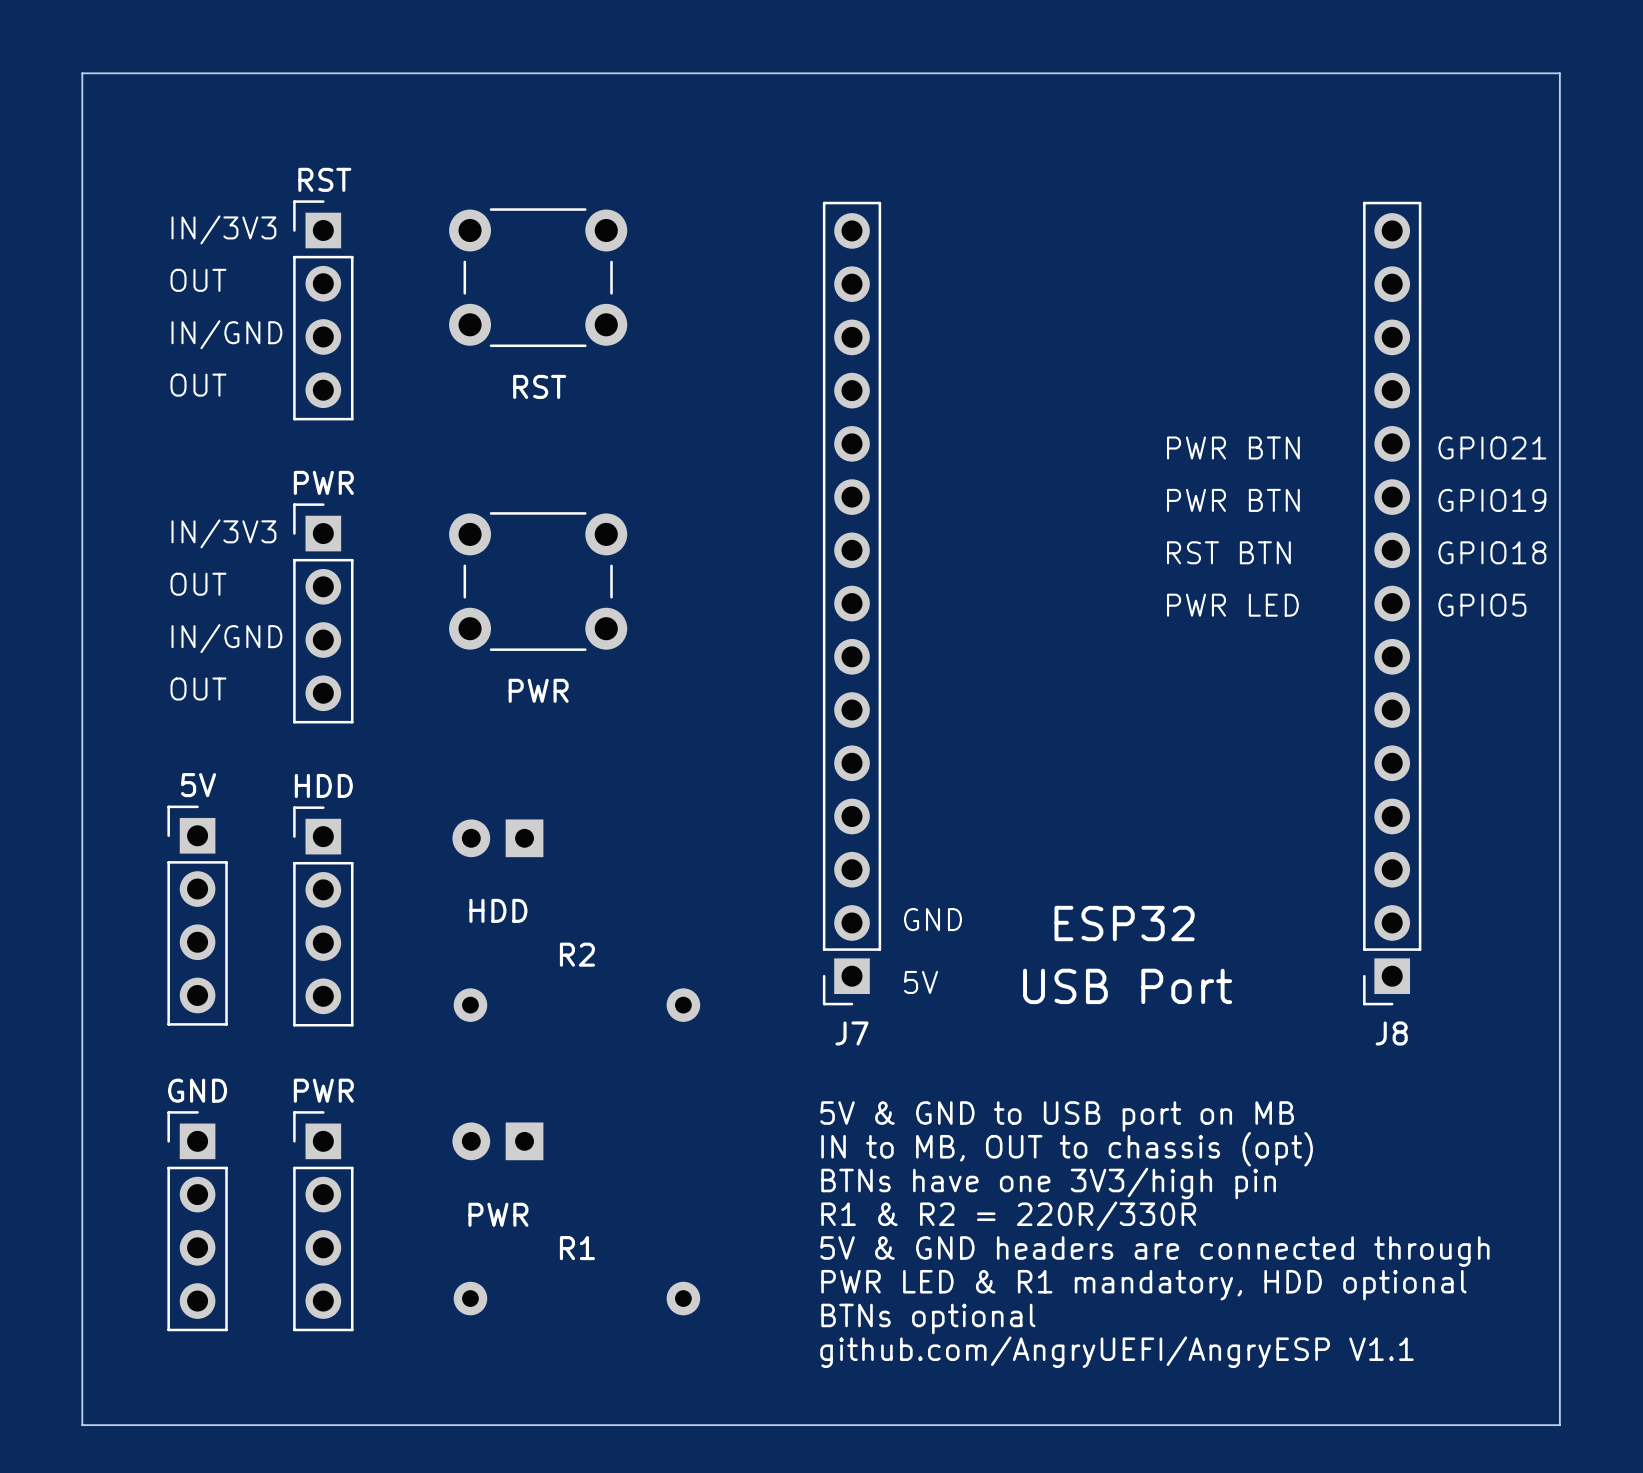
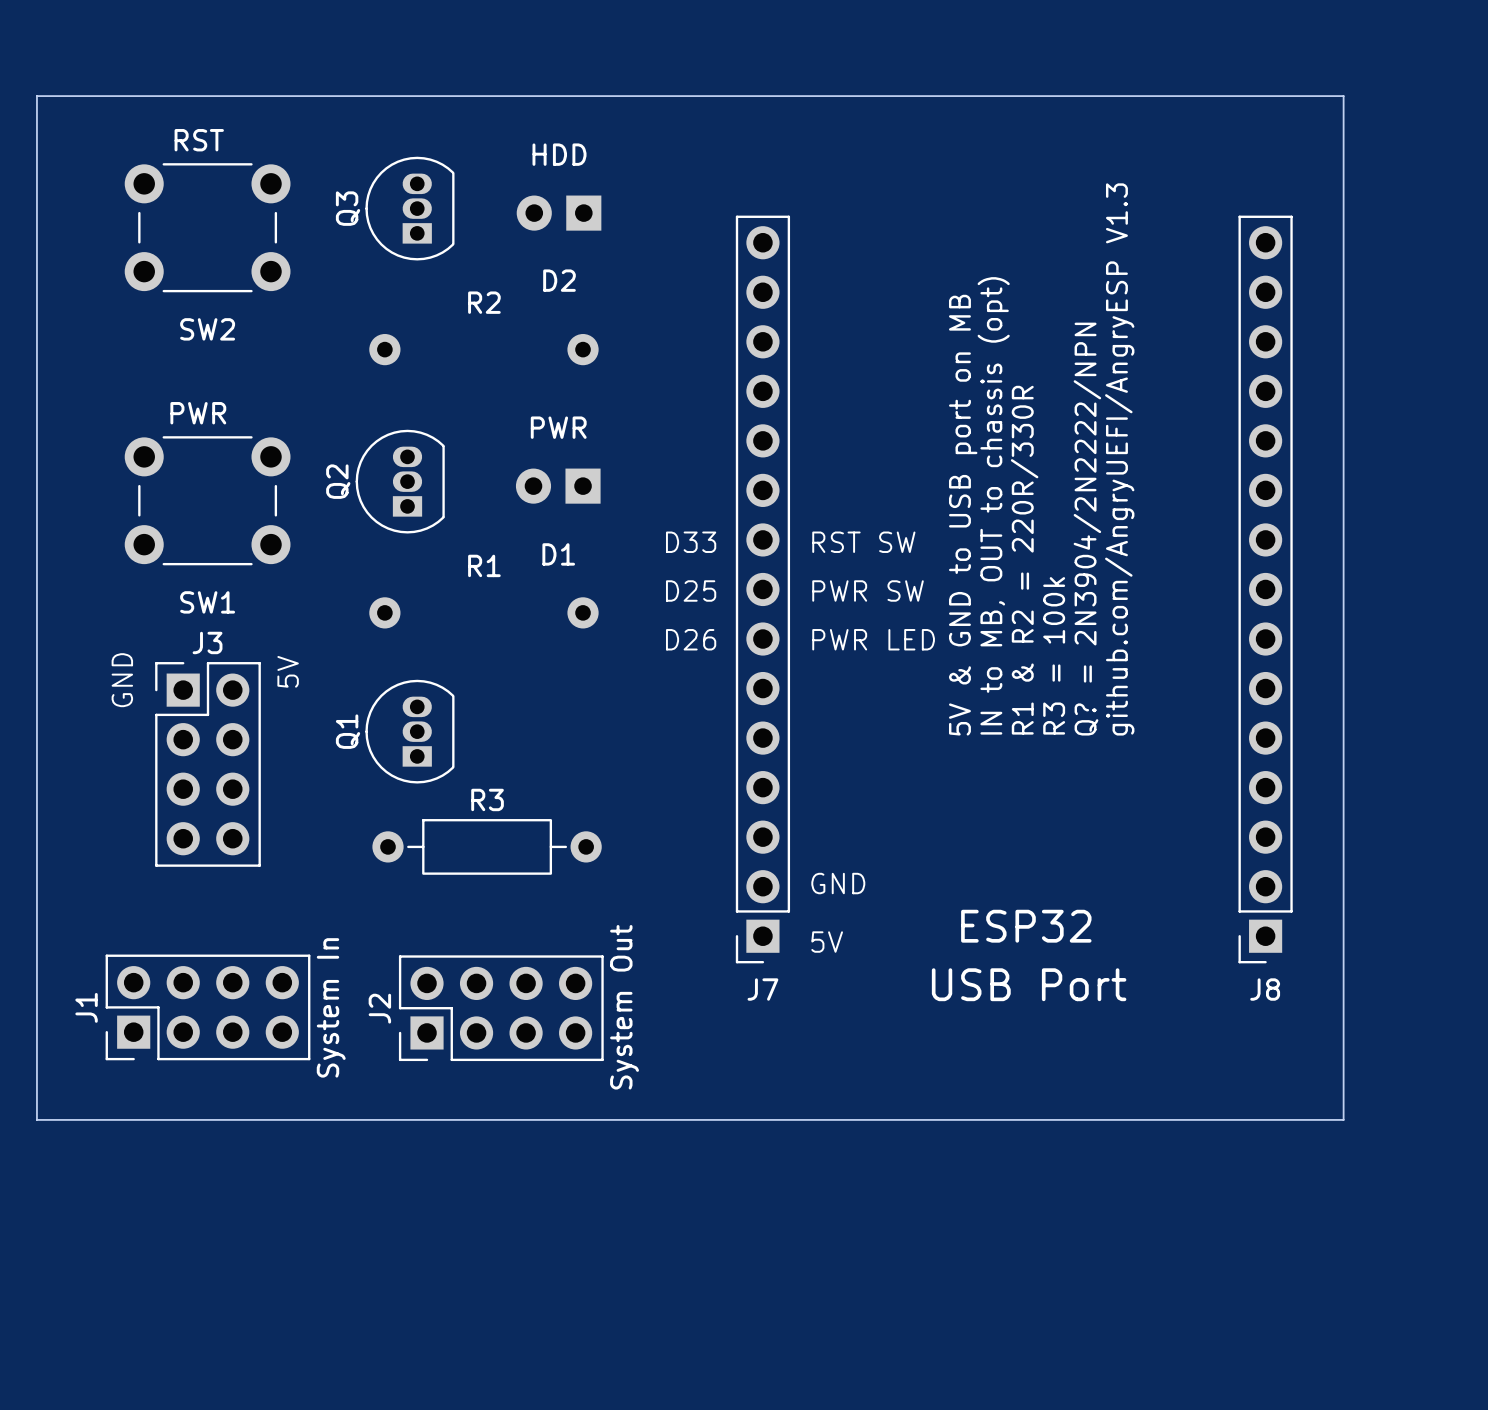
board edge: (82, 73) (82, 1425) (1559, 1425) (1559, 73) (1476, 73) -> (46, 96) (36, 96) (36, 1119) (1343, 1119) (1343, 96)
Q3: none -> (409, 208)
D2: none -> HDD (559, 213)
SW2: none -> RST (207, 227)
text: IN/3V3 (223, 229) -> none
RST: (538, 277) -> none
text: OUT (198, 280) -> none
RST: (323, 310) -> none
text: IN/GND (226, 334) -> none
text: OUT (198, 385) -> none
text: PWR BTN (1233, 448) -> none
text: GPIO21 (1492, 448) -> none
text: none -> github.com/AngryUEFI/AngryESP V1.3 (1119, 459)
Q2: none -> (400, 481)
D1: none -> PWR (558, 486)
text: PWR BTN (1233, 500) -> none
text: GPIO19 (1492, 500) -> none
SW1: none -> PWR (207, 500)
text: IN/3V3 (223, 533) -> none
text: none -> Q? = 2N3904/2N2222/NPN (1087, 529)
text: none -> D33 (691, 542)
text: none -> RST SW (863, 542)
text: RST BTN (1228, 552) -> none
text: GPIO18 (1492, 552) -> none
text: none -> R1 & R2 = 220R/330R (1024, 560)
PWR: (538, 581) -> none
text: OUT (198, 584) -> none
text: none -> D25 (691, 590)
text: none -> PWR SW (868, 590)
text position: PWR LED (1232, 605) -> PWR LED (873, 639)
text: GPIO5 (1482, 605) -> none
PWR: (323, 613) -> none
text: IN/GND (226, 638) -> GND (122, 680)
text: none -> D26 (691, 639)
text: none -> R3 = 100k (1054, 655)
text: OUT (198, 689) -> none
text: none -> 5V (288, 671)
Q1: none -> (409, 731)
J3: none -> (208, 764)
HDD: (497, 838) -> none
R3: none -> (487, 846)
5V: (197, 915) -> none
HDD: (323, 916) -> none
text position: ESP32 (1124, 923) -> ESP32 (1026, 926)
text position: USB Port (1127, 986) -> USB Port (1029, 984)
R2 position: (576, 1005) -> (483, 349)
J1: none -> System In (208, 1007)
J2: none -> System Out (501, 1008)
text rotation: 0° (1057, 1116) -> 90° counterclockwise (963, 515)
text position: 5V & GND to USB port on MB (1057, 1116) -> 5V & GND to USB port on MB (963, 515)
PWR: (497, 1141) -> none
text rotation: 0° (1067, 1149) -> 90° counterclockwise (993, 505)
text position: IN to MB, OUT to chassis (opt) (1067, 1149) -> IN to MB, OUT to chassis (opt) (993, 505)
text: BTNs have one 3V3/high pin (1048, 1183) -> none
text: R1 & R2 = 220R/330R (1008, 1216) -> none
GND: (197, 1221) -> none
PWR: (323, 1221) -> none
text: 5V & GND headers are connected through (1154, 1251) -> none
text: PWR LED & R1 mandatory, HDD optional (1143, 1285) -> none
R1 position: (576, 1298) -> (483, 612)
text: BTNs optional (928, 1318) -> none
text: github.com/AngryUEFI/AngryESP V1.1 (1116, 1352) -> none

